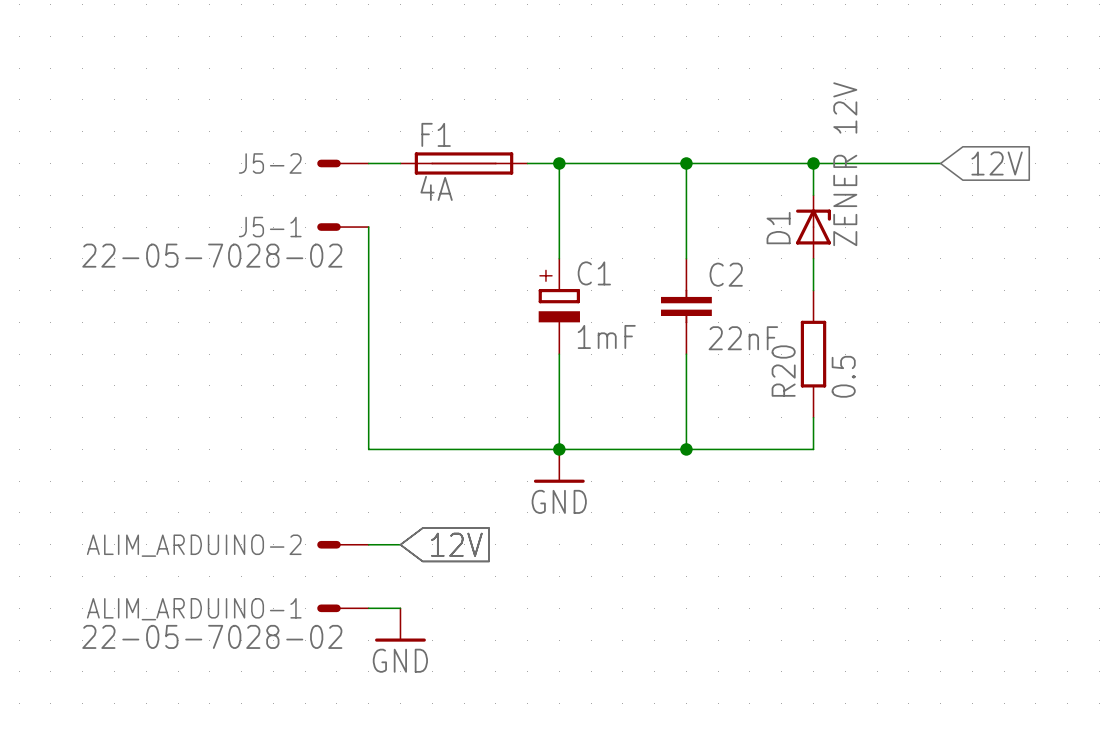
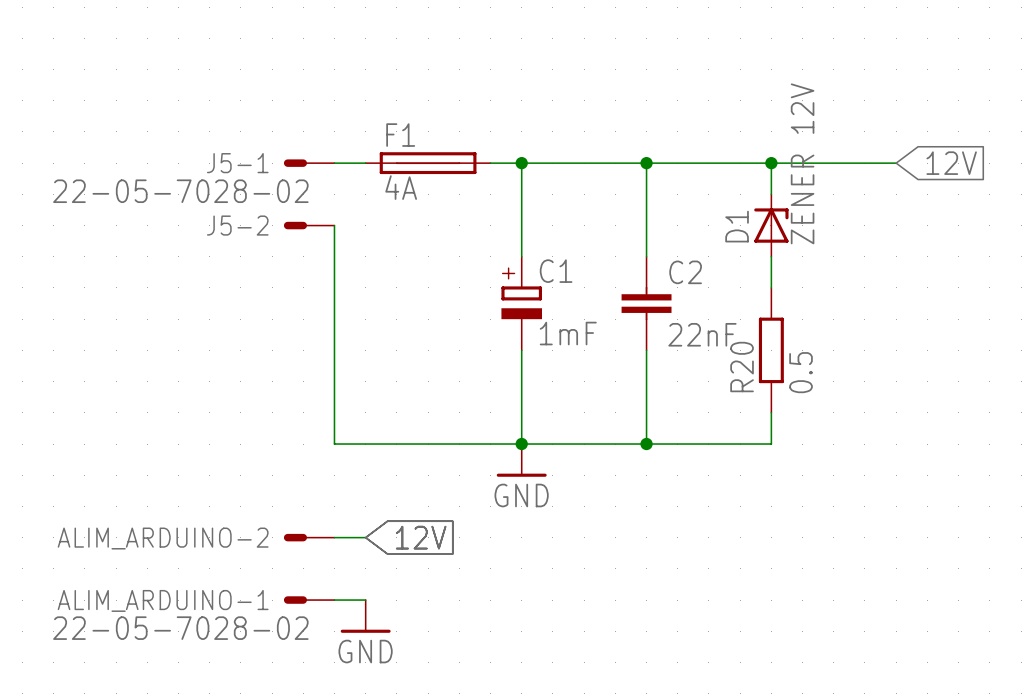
J5-2 name: J5-2 (270, 163) -> J5-1 (237, 163)
J5-2 value: none -> 22-05-7028-02 (180, 191)
J5-1 name: J5-1 (270, 227) -> J5-2 (237, 225)
J5-1 value: 22-05-7028-02 (212, 255) -> none

